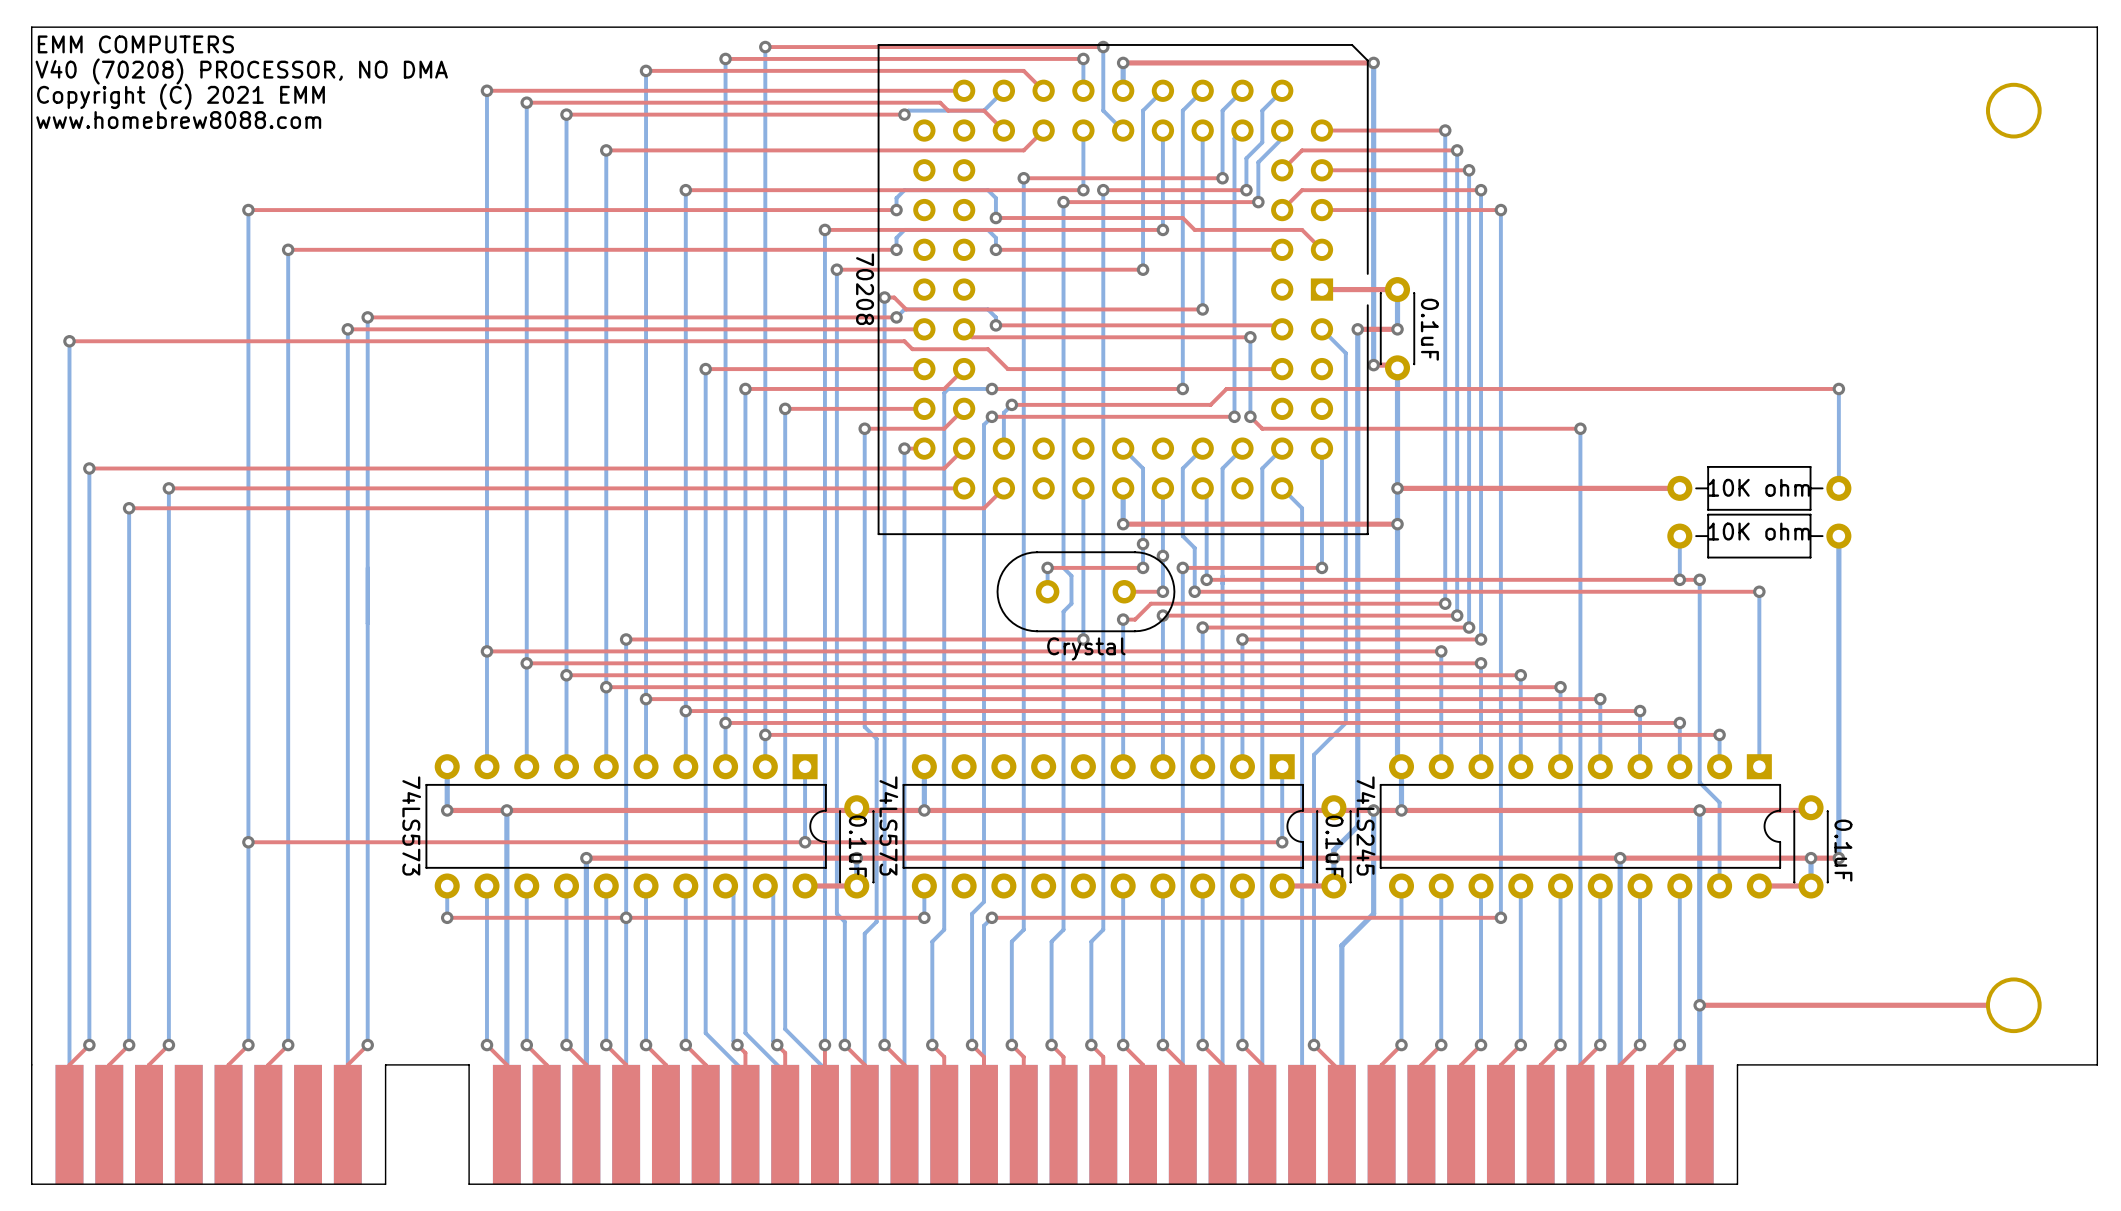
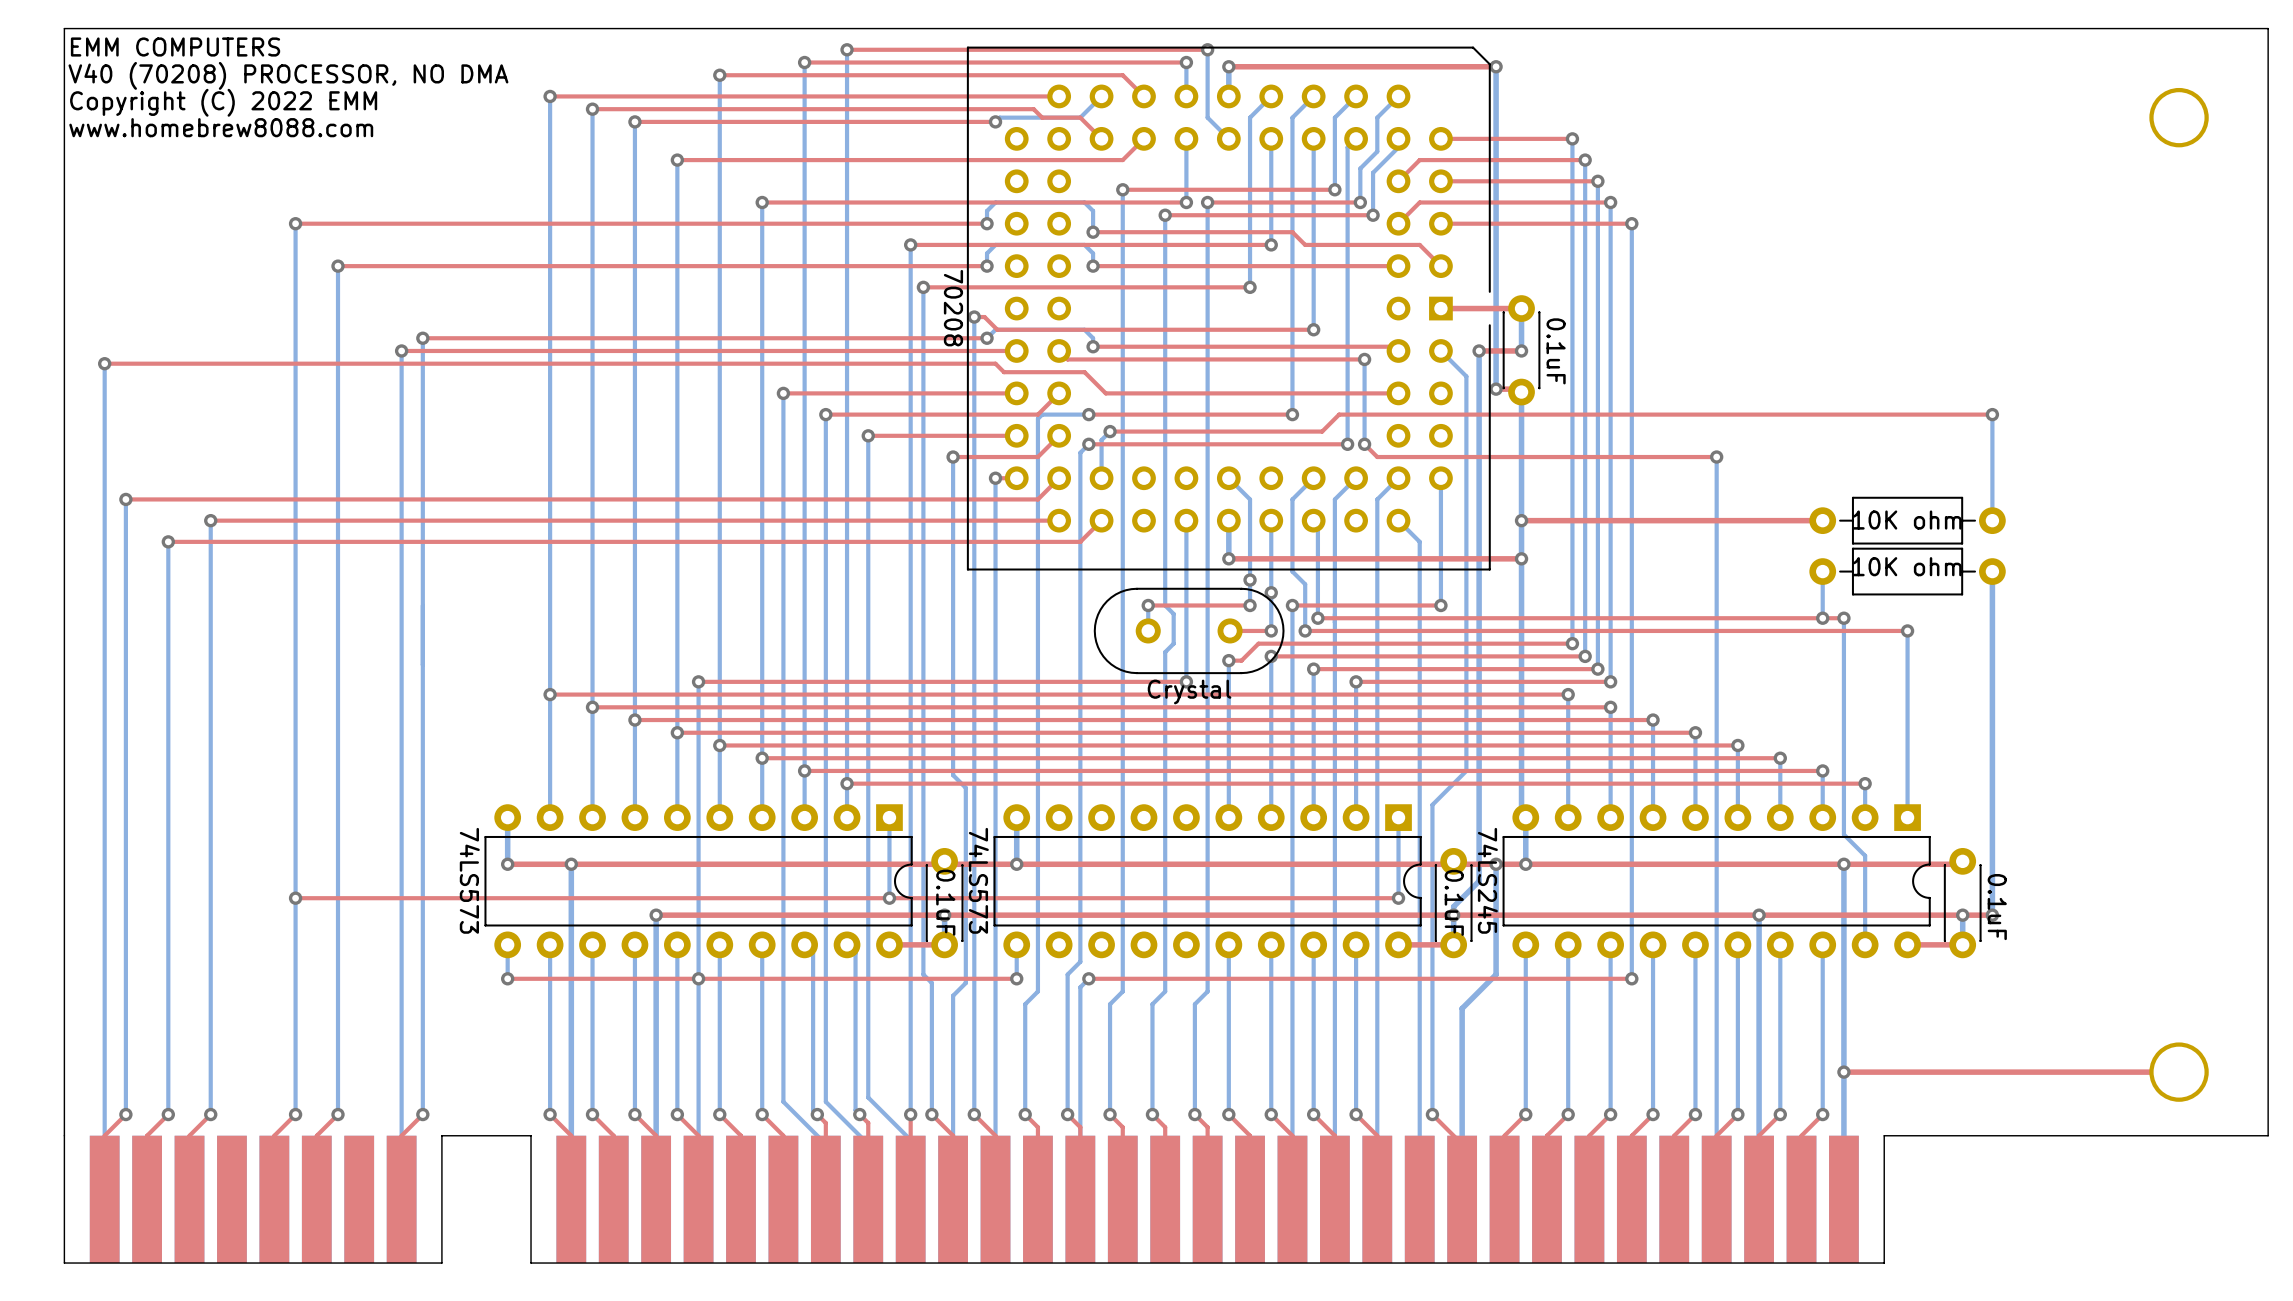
text: Copyright (C) 2021 EMM (180, 96) -> Copyright (C) 2022 EMM (223, 102)

